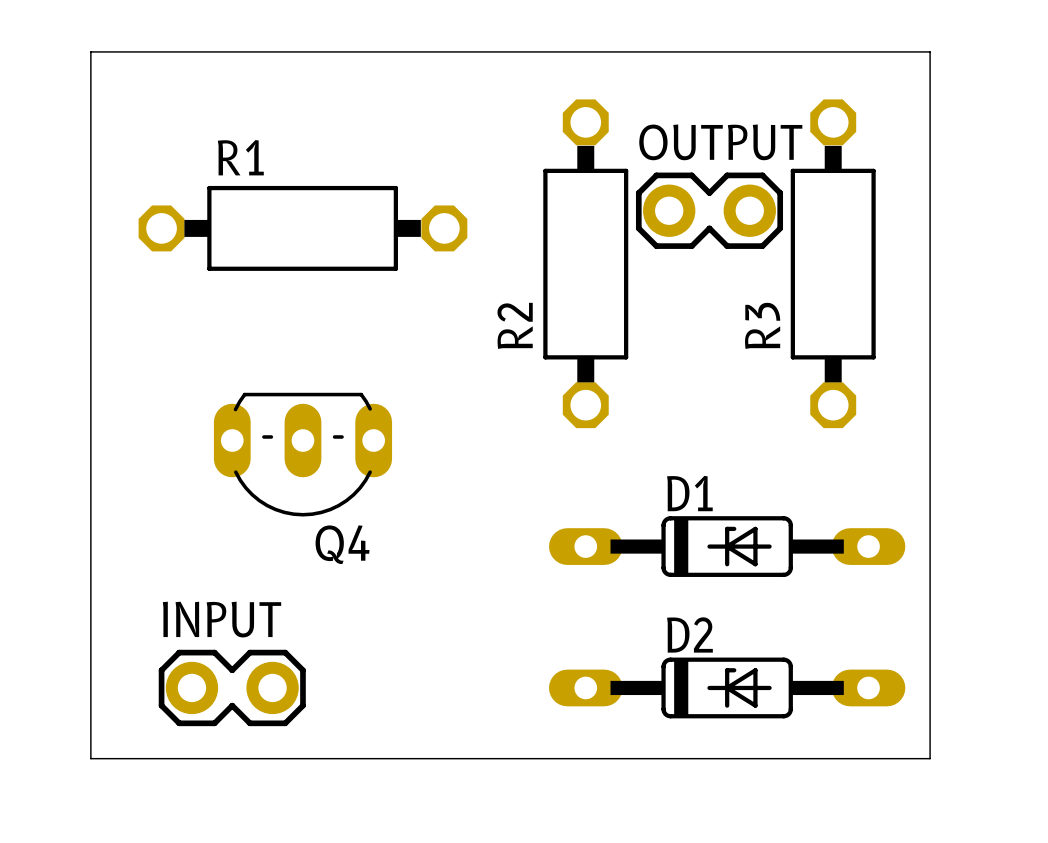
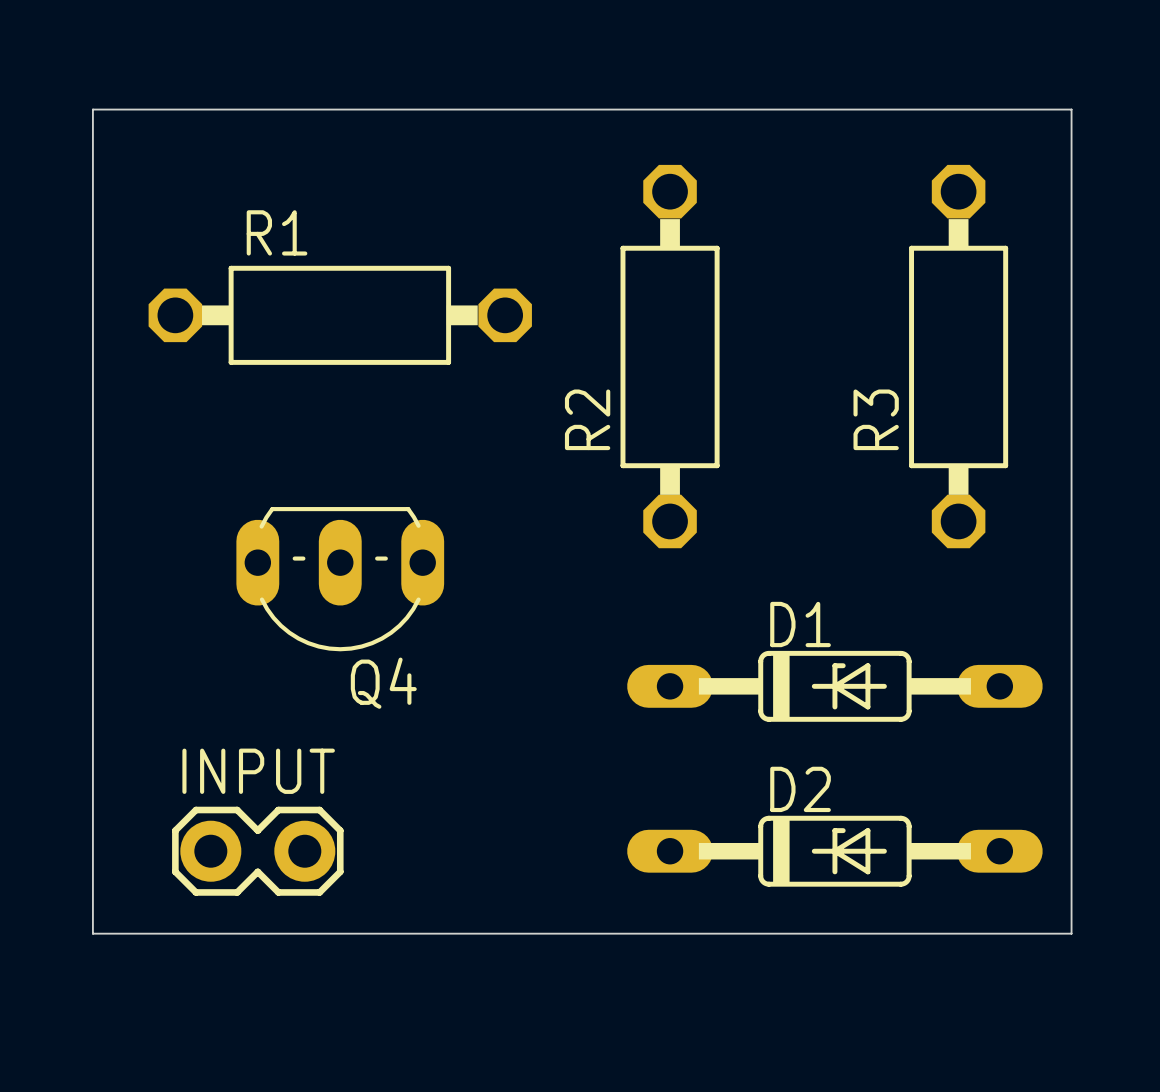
OUTPUT: (709, 210) -> none

